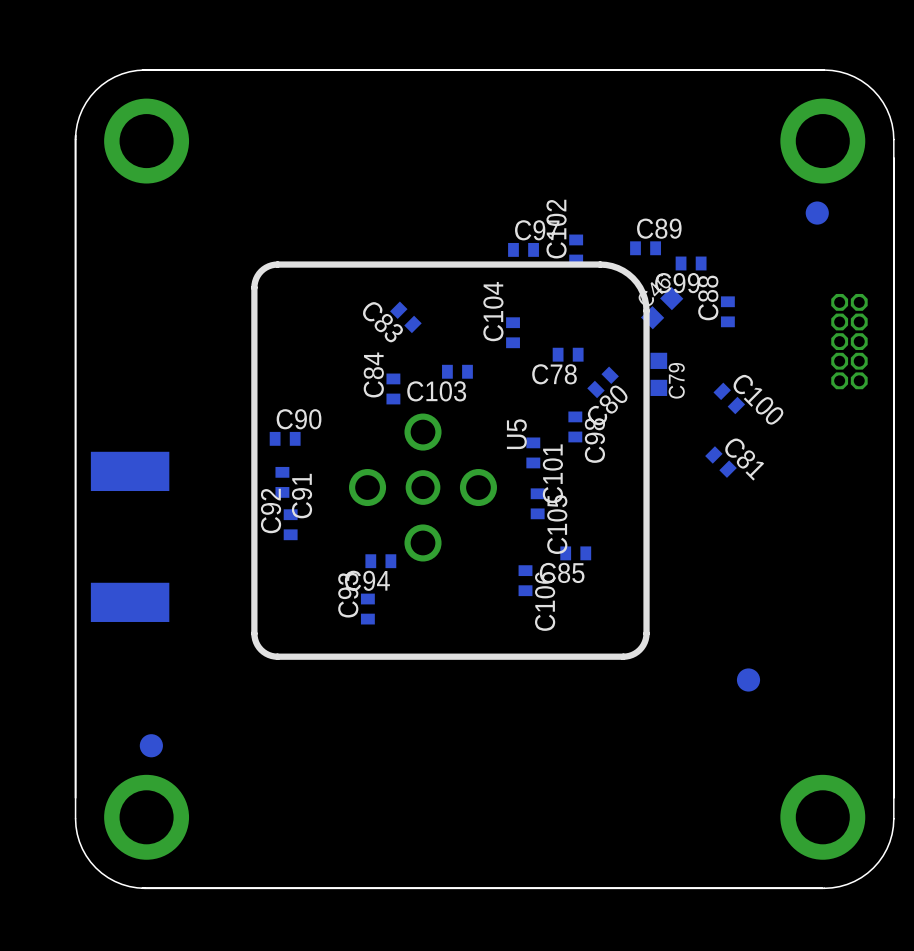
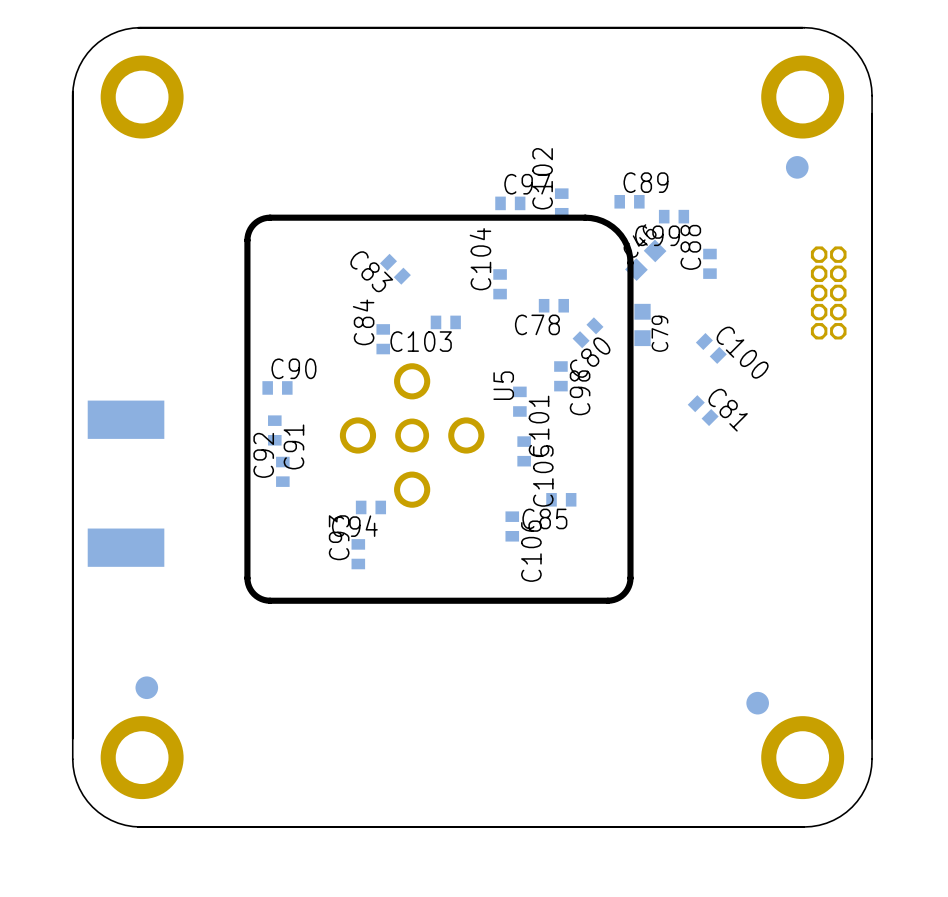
part position: (748, 679) -> (757, 703)

